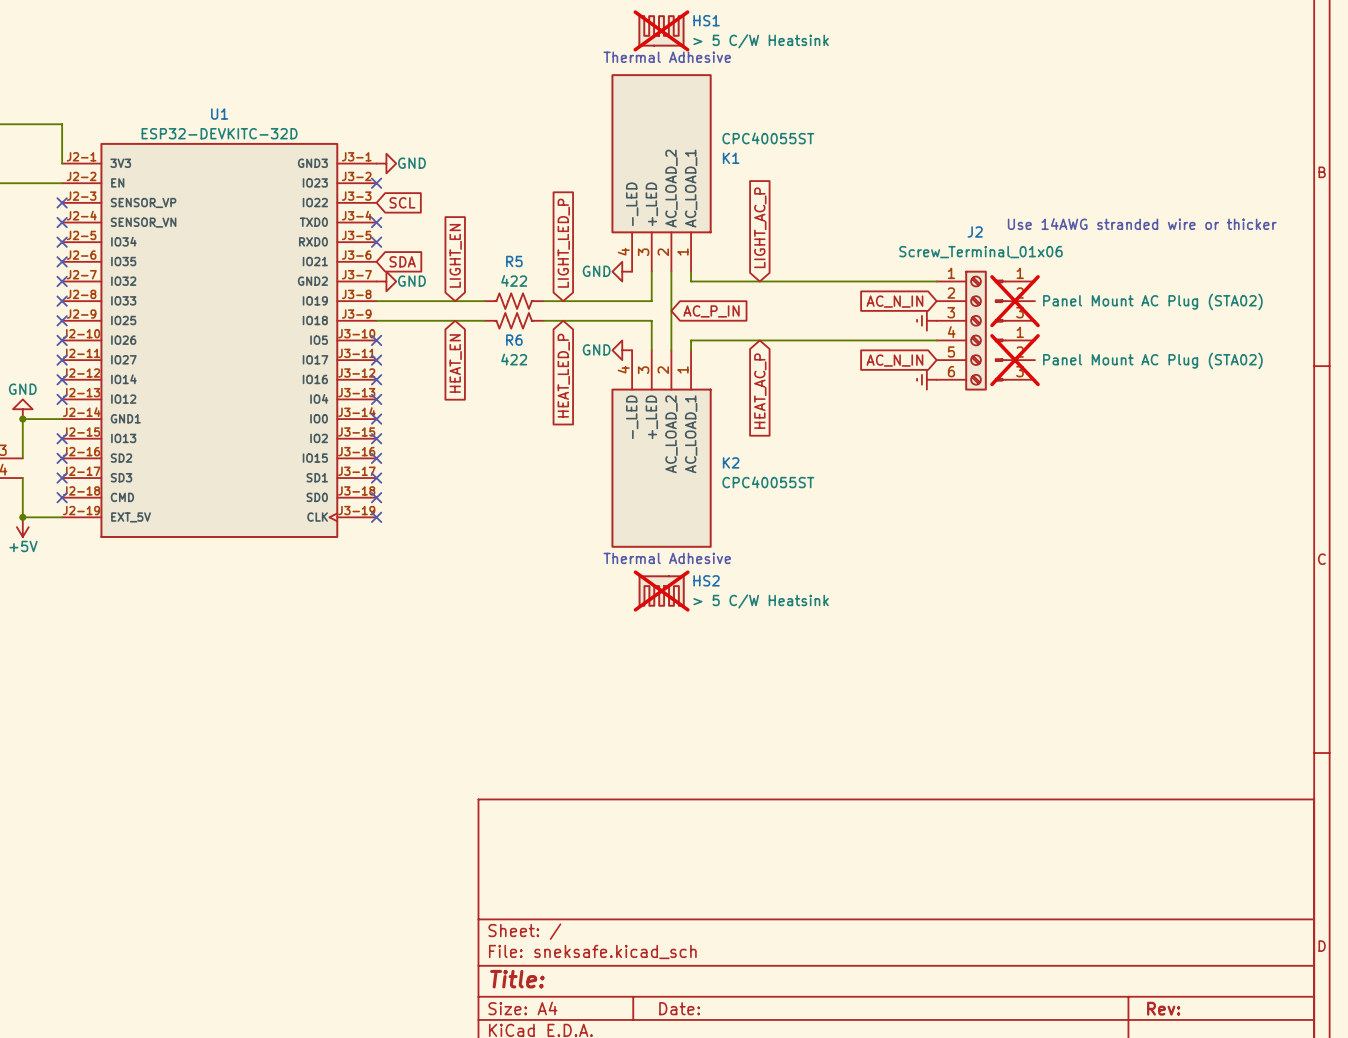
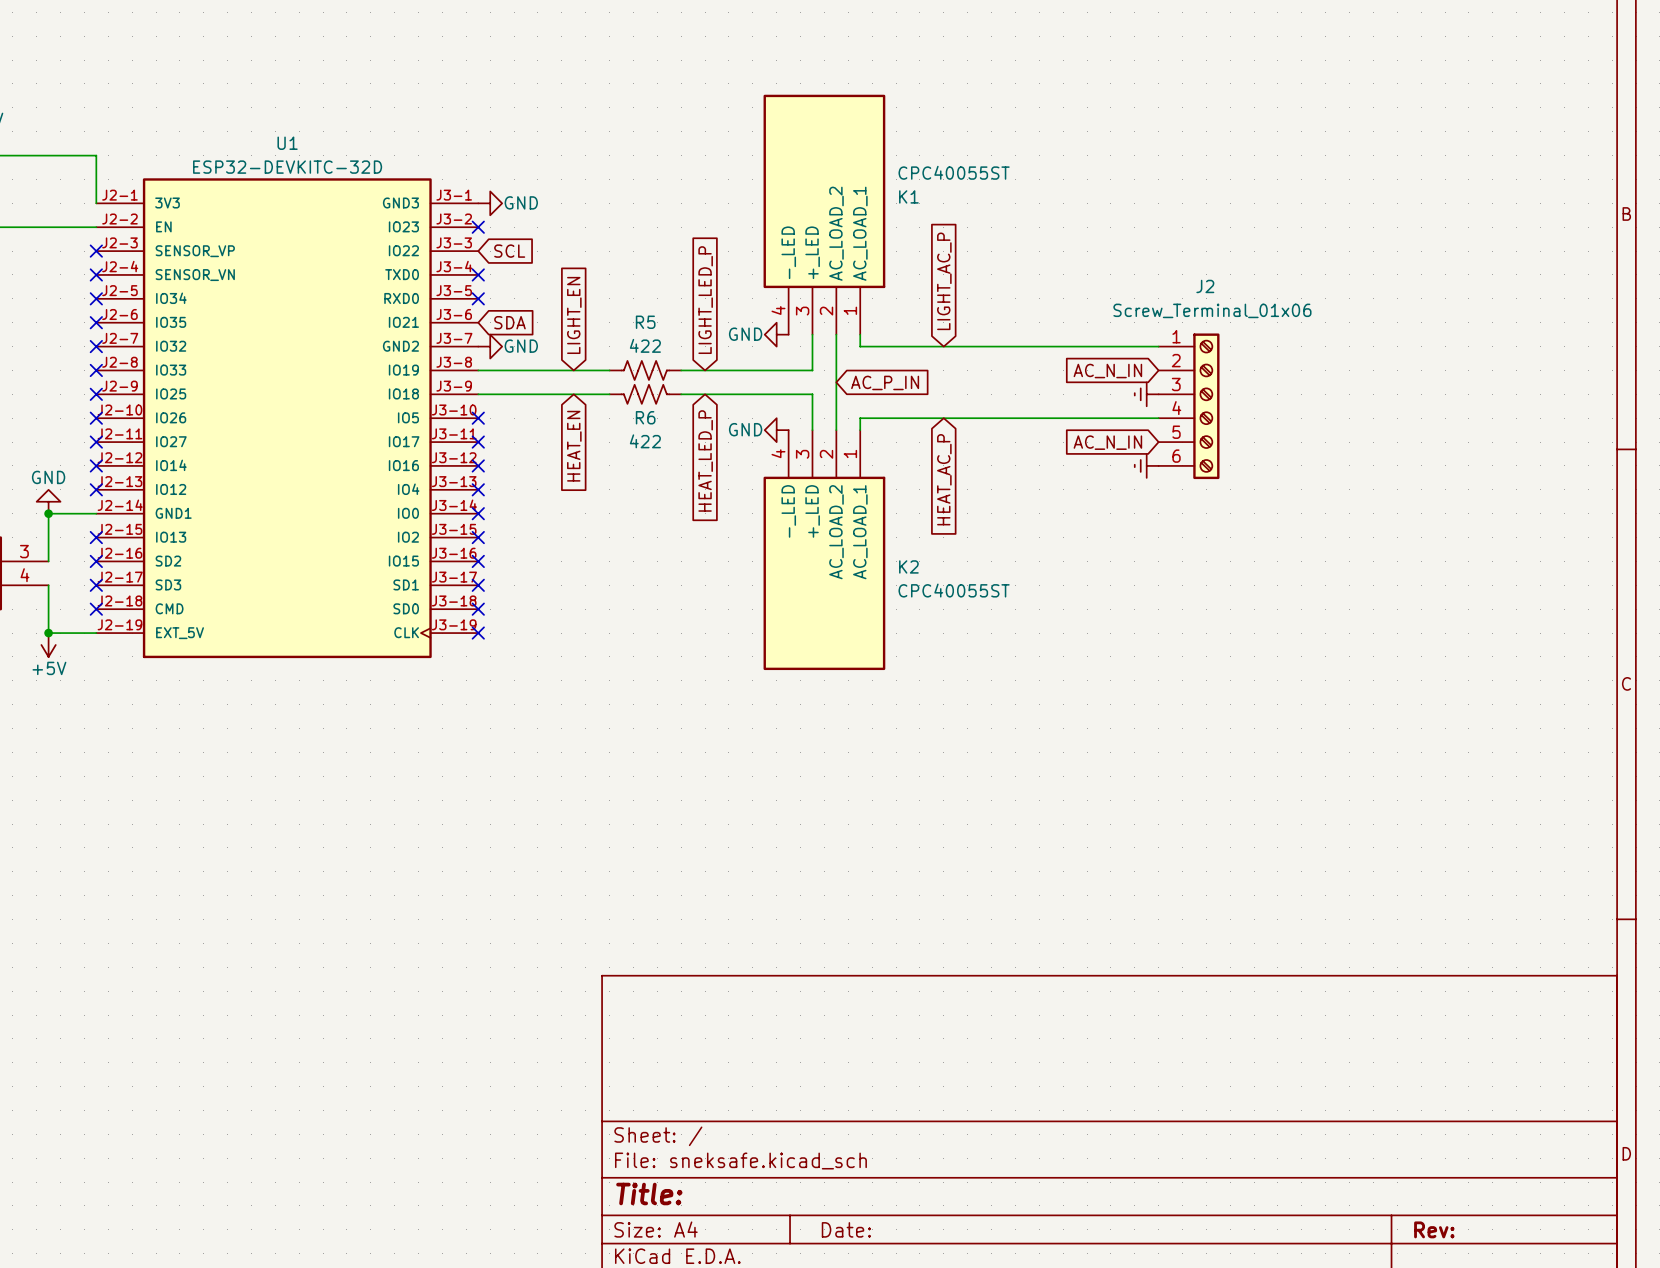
HS1: > 5 C/W Heatsink (661, 30) -> none
text: Thermal Adhesive (667, 57) -> none
text: Use 14AWG stranded wire or thicker (1142, 224) -> none
part: Panel Mount AC Plug (STA02) (1015, 301) -> none
part: Panel Mount AC Plug (STA02) (1015, 360) -> none
text: Thermal Adhesive (667, 558) -> none
HS2: > 5 C/W Heatsink (661, 591) -> none

